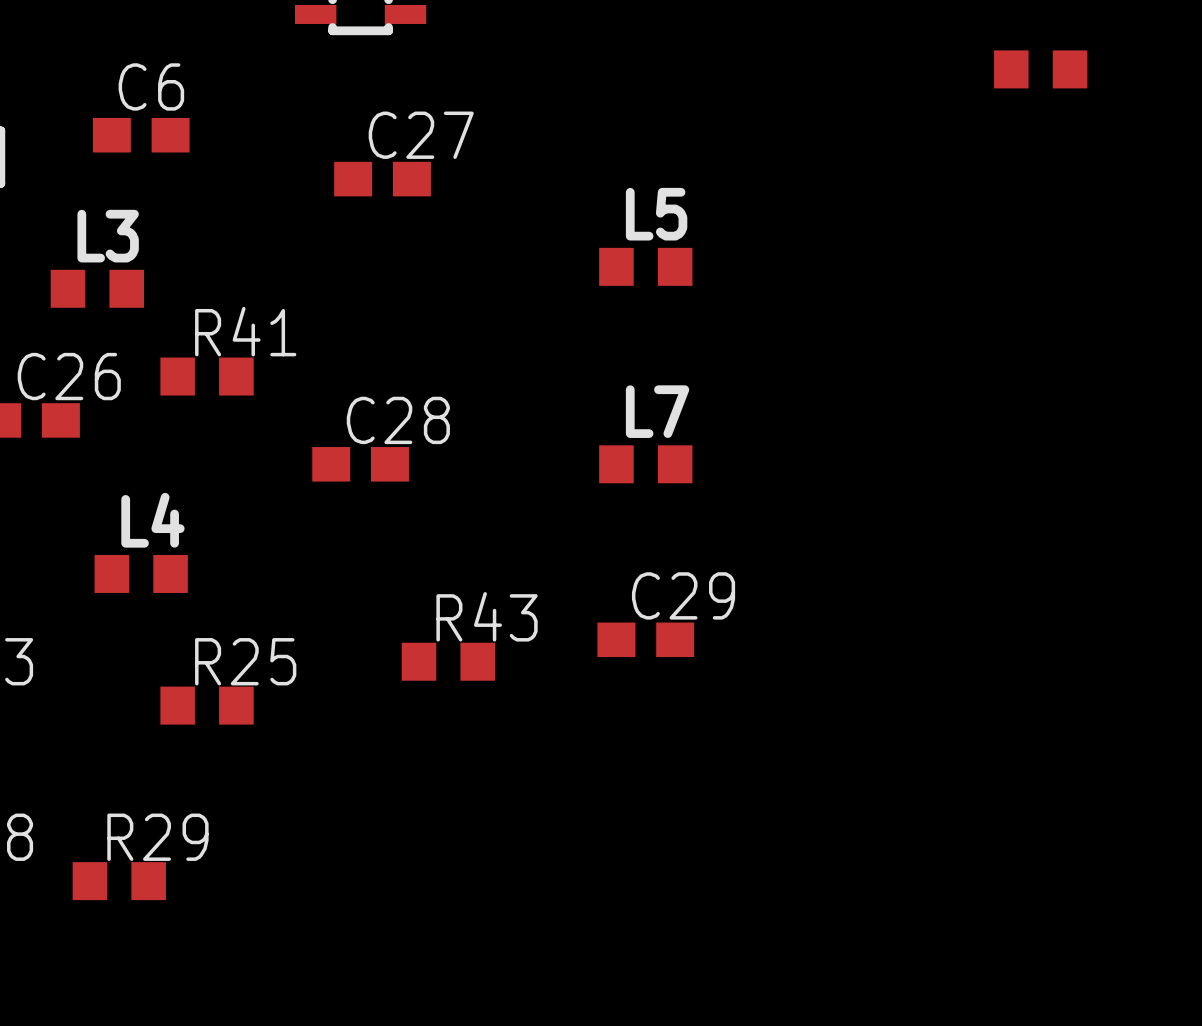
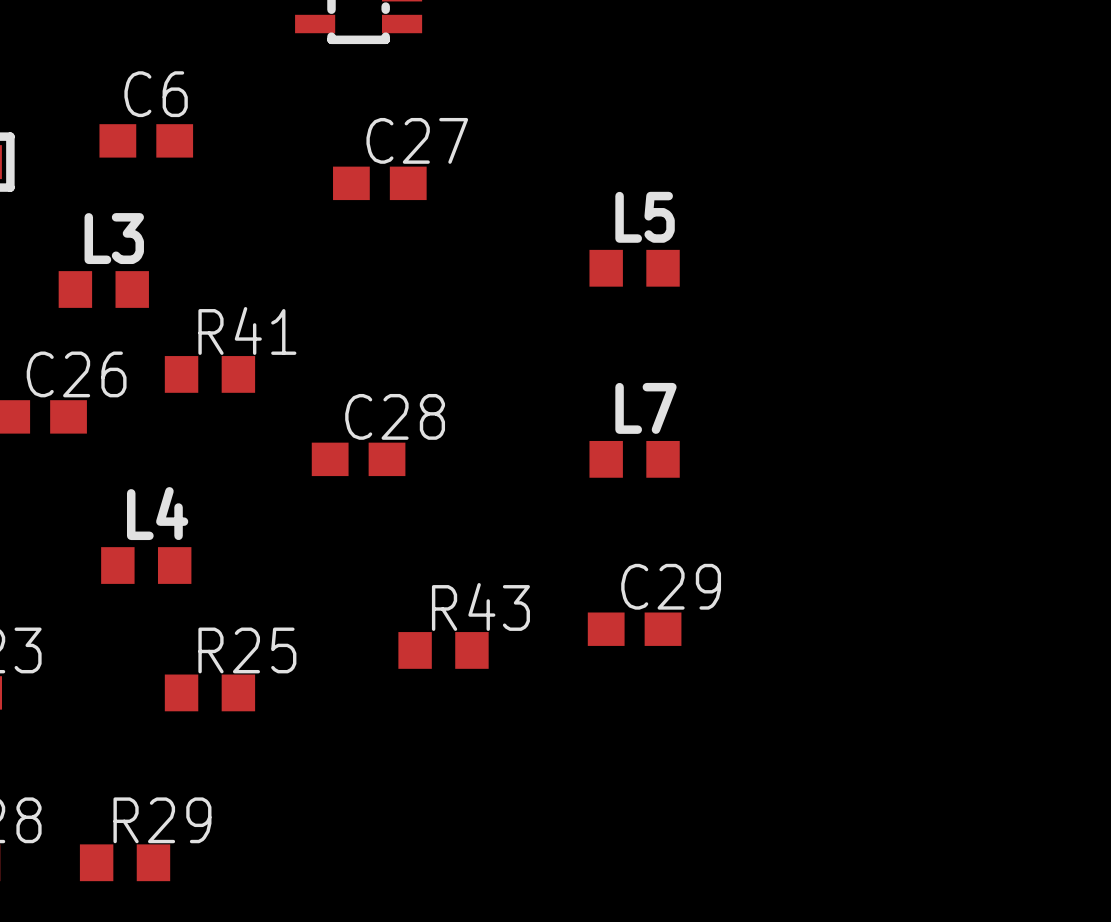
part: (1040, 69) -> none

